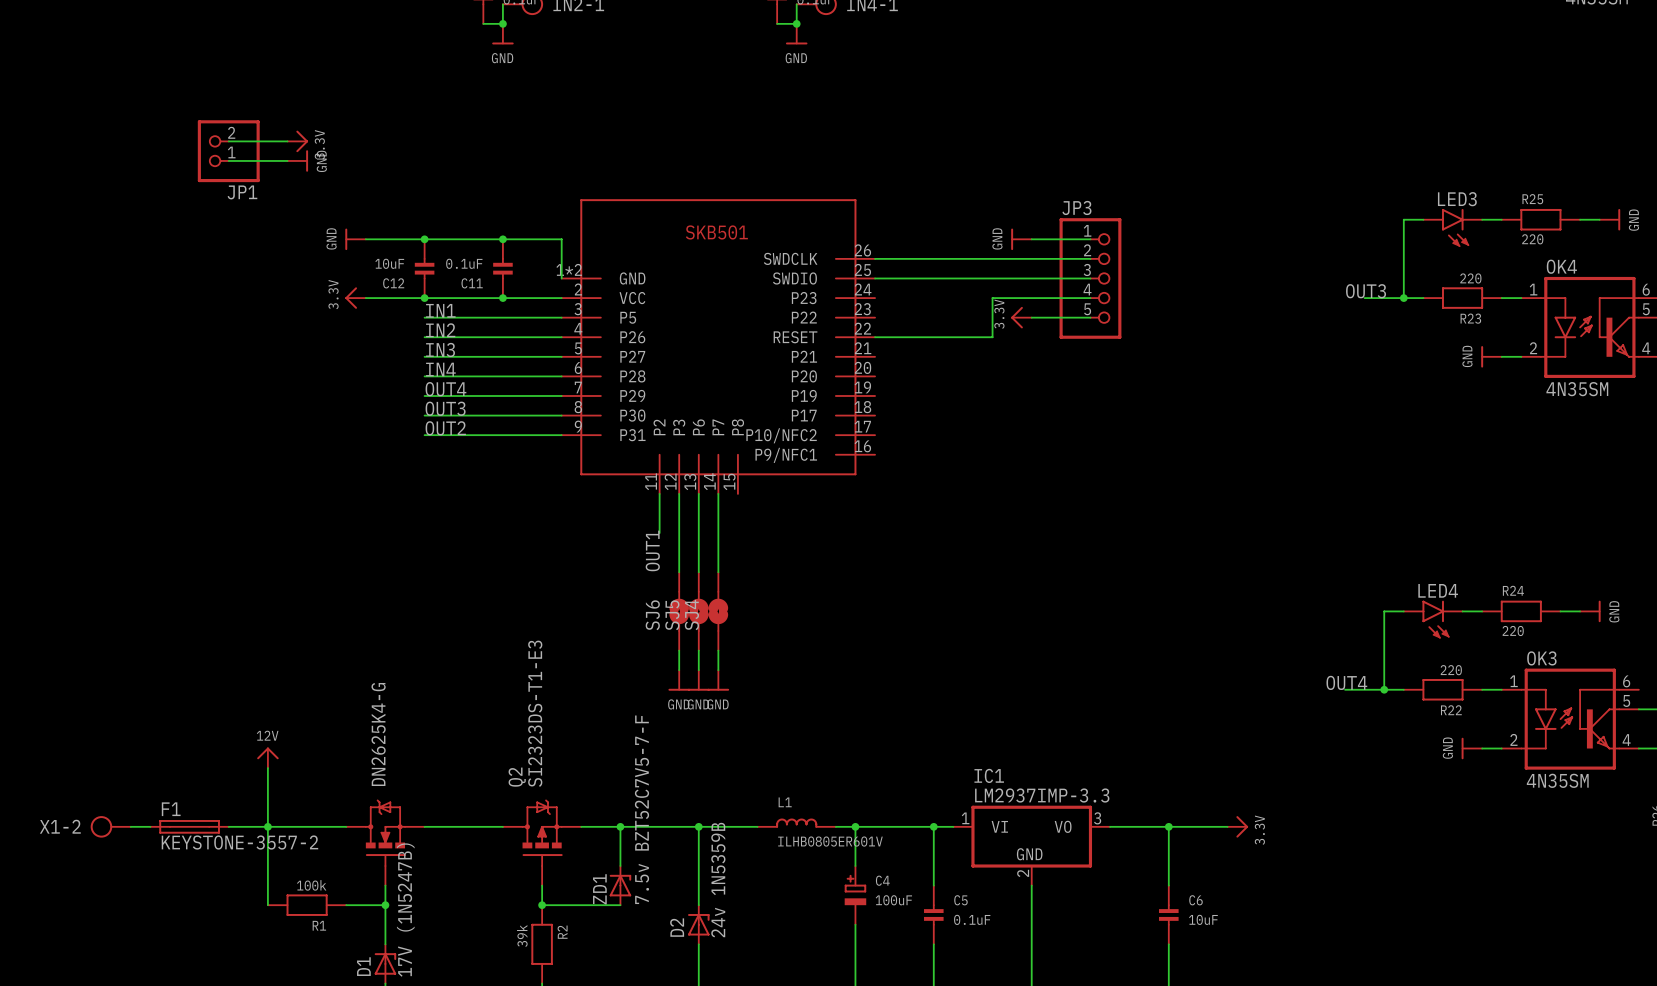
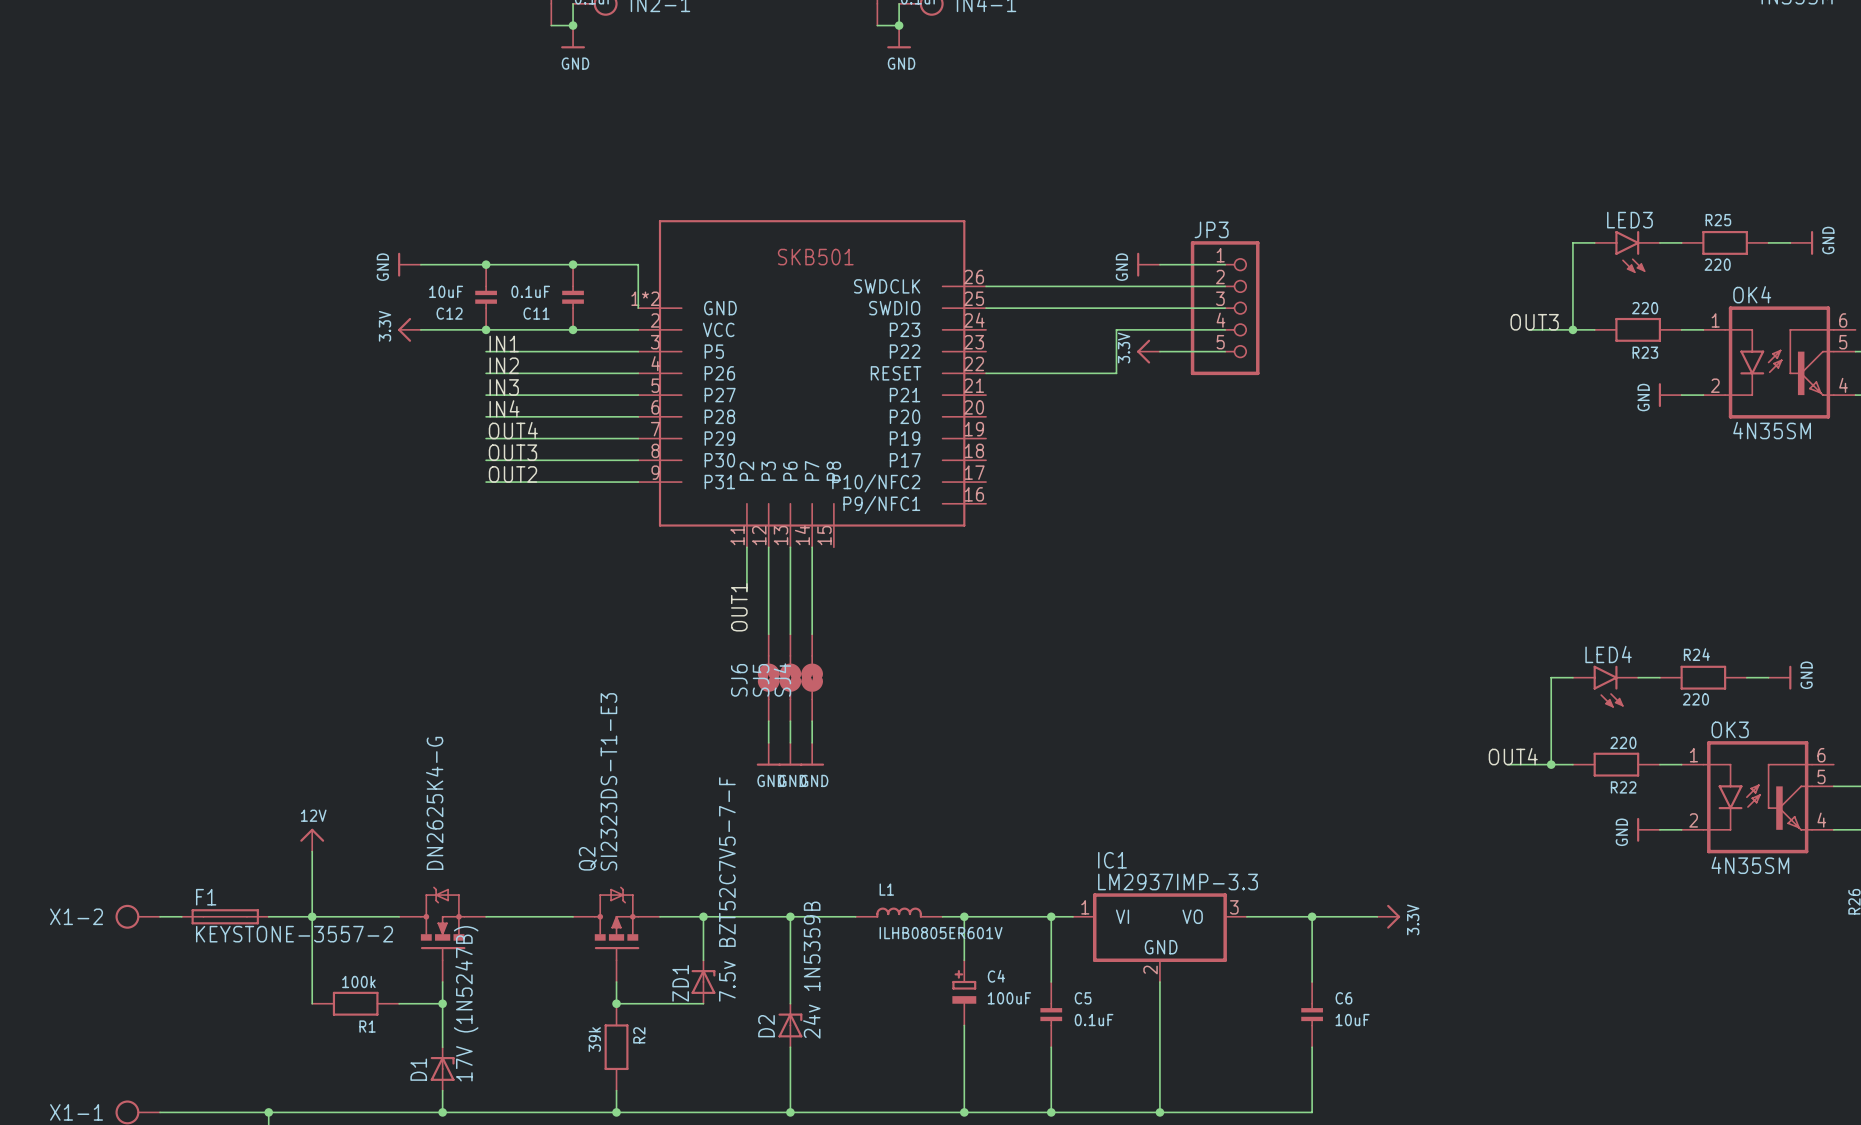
wire: (228, 141) (287, 141) -> none
power symbol: 3.3V (297, 141) -> none
JP1: (228, 151) -> none
wire: (228, 160) (287, 160) -> none
power symbol: GND (297, 160) -> none

